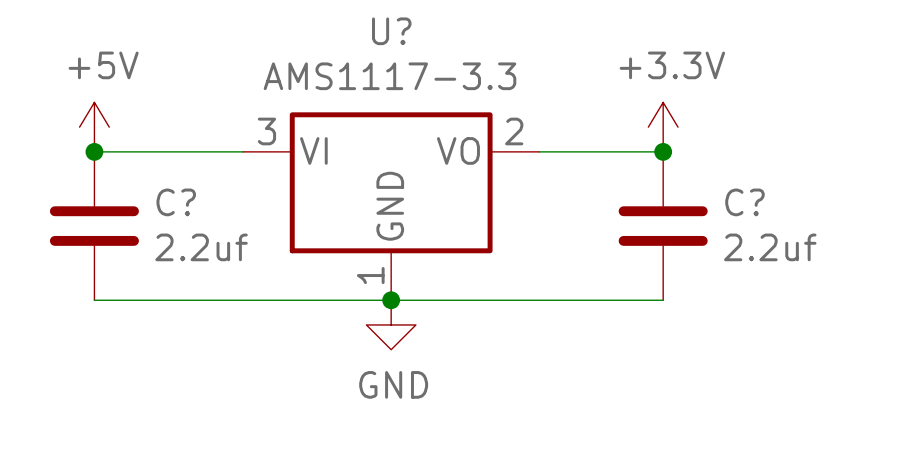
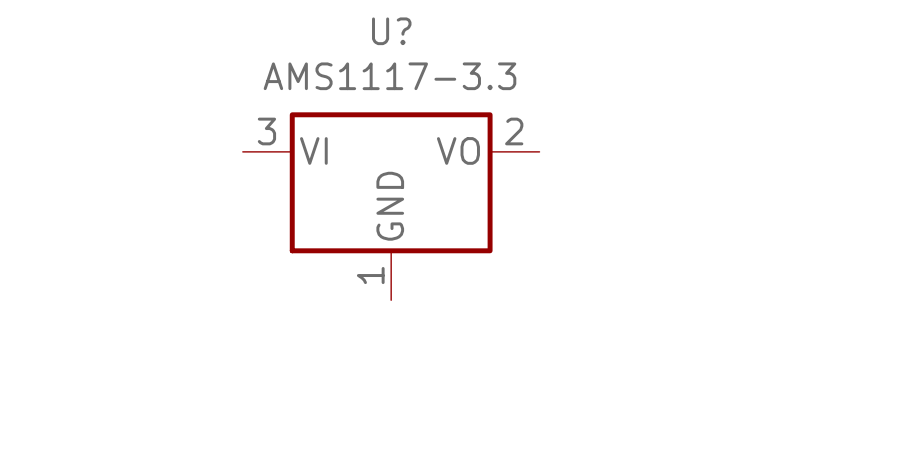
power symbol: +5V (94, 127) -> none
power symbol: +3.3V (663, 127) -> none
wire: (94, 151) (242, 151) -> none
junction: (94, 151) -> none
wire: (539, 151) (663, 151) -> none
junction: (663, 151) -> none
C?: 2.2uf (94, 226) -> none
C?: 2.2uf (663, 226) -> none
wire: (94, 300) (663, 300) -> none
junction: (391, 300) -> none
power symbol: GND (391, 324) -> none

